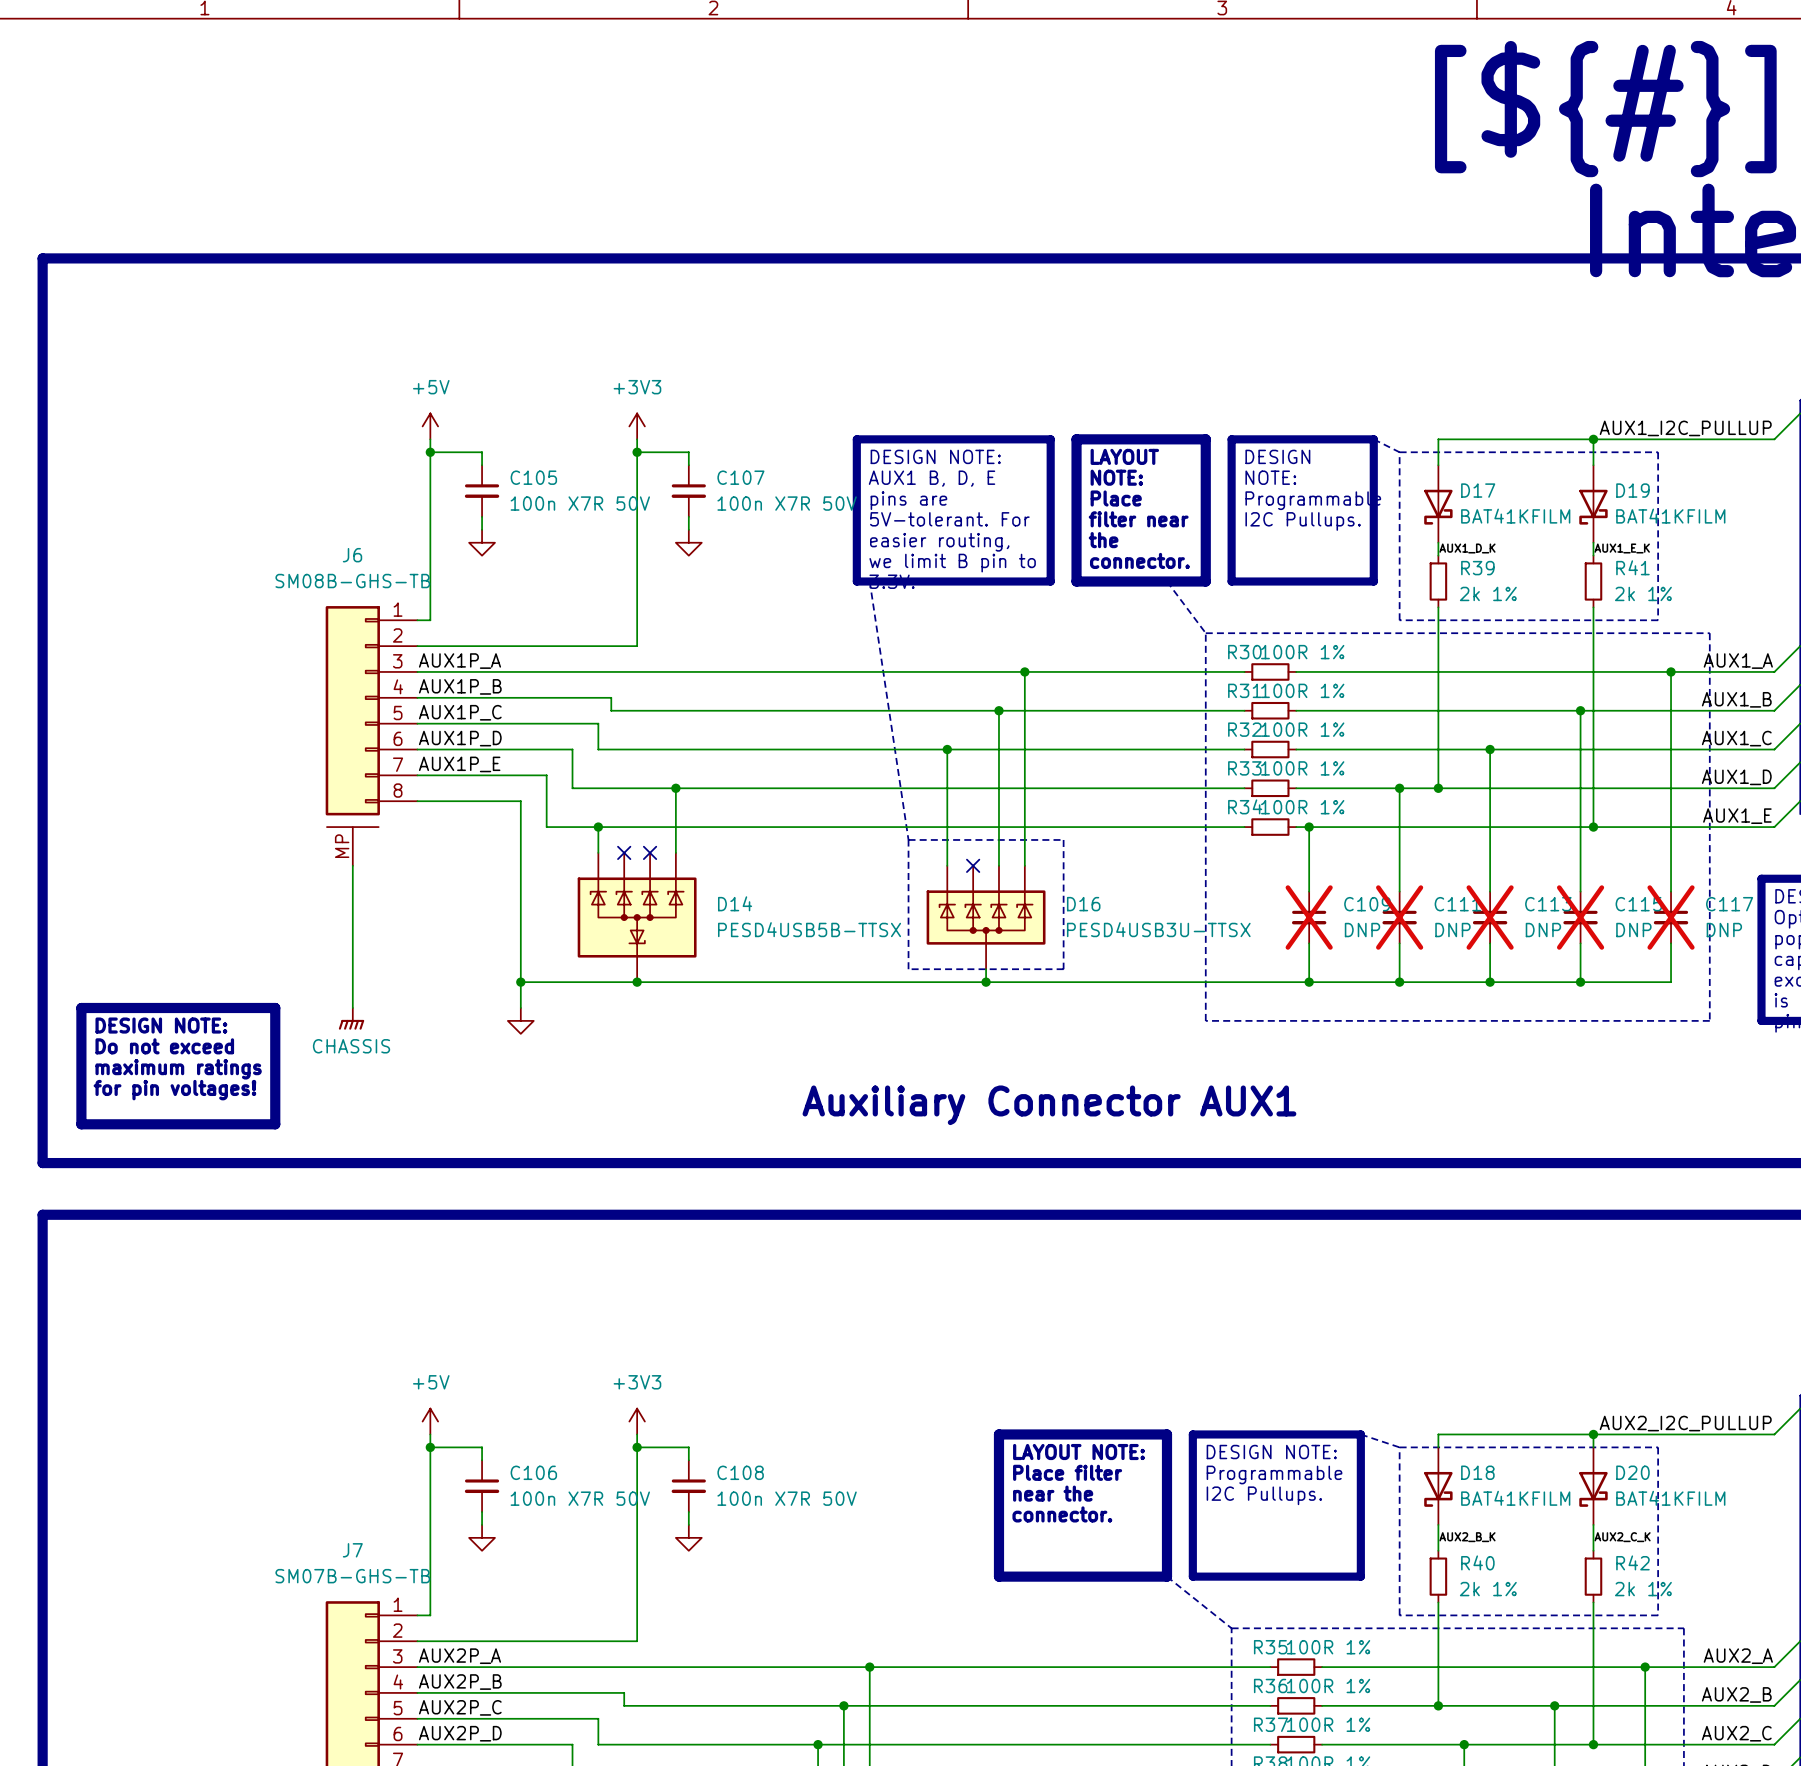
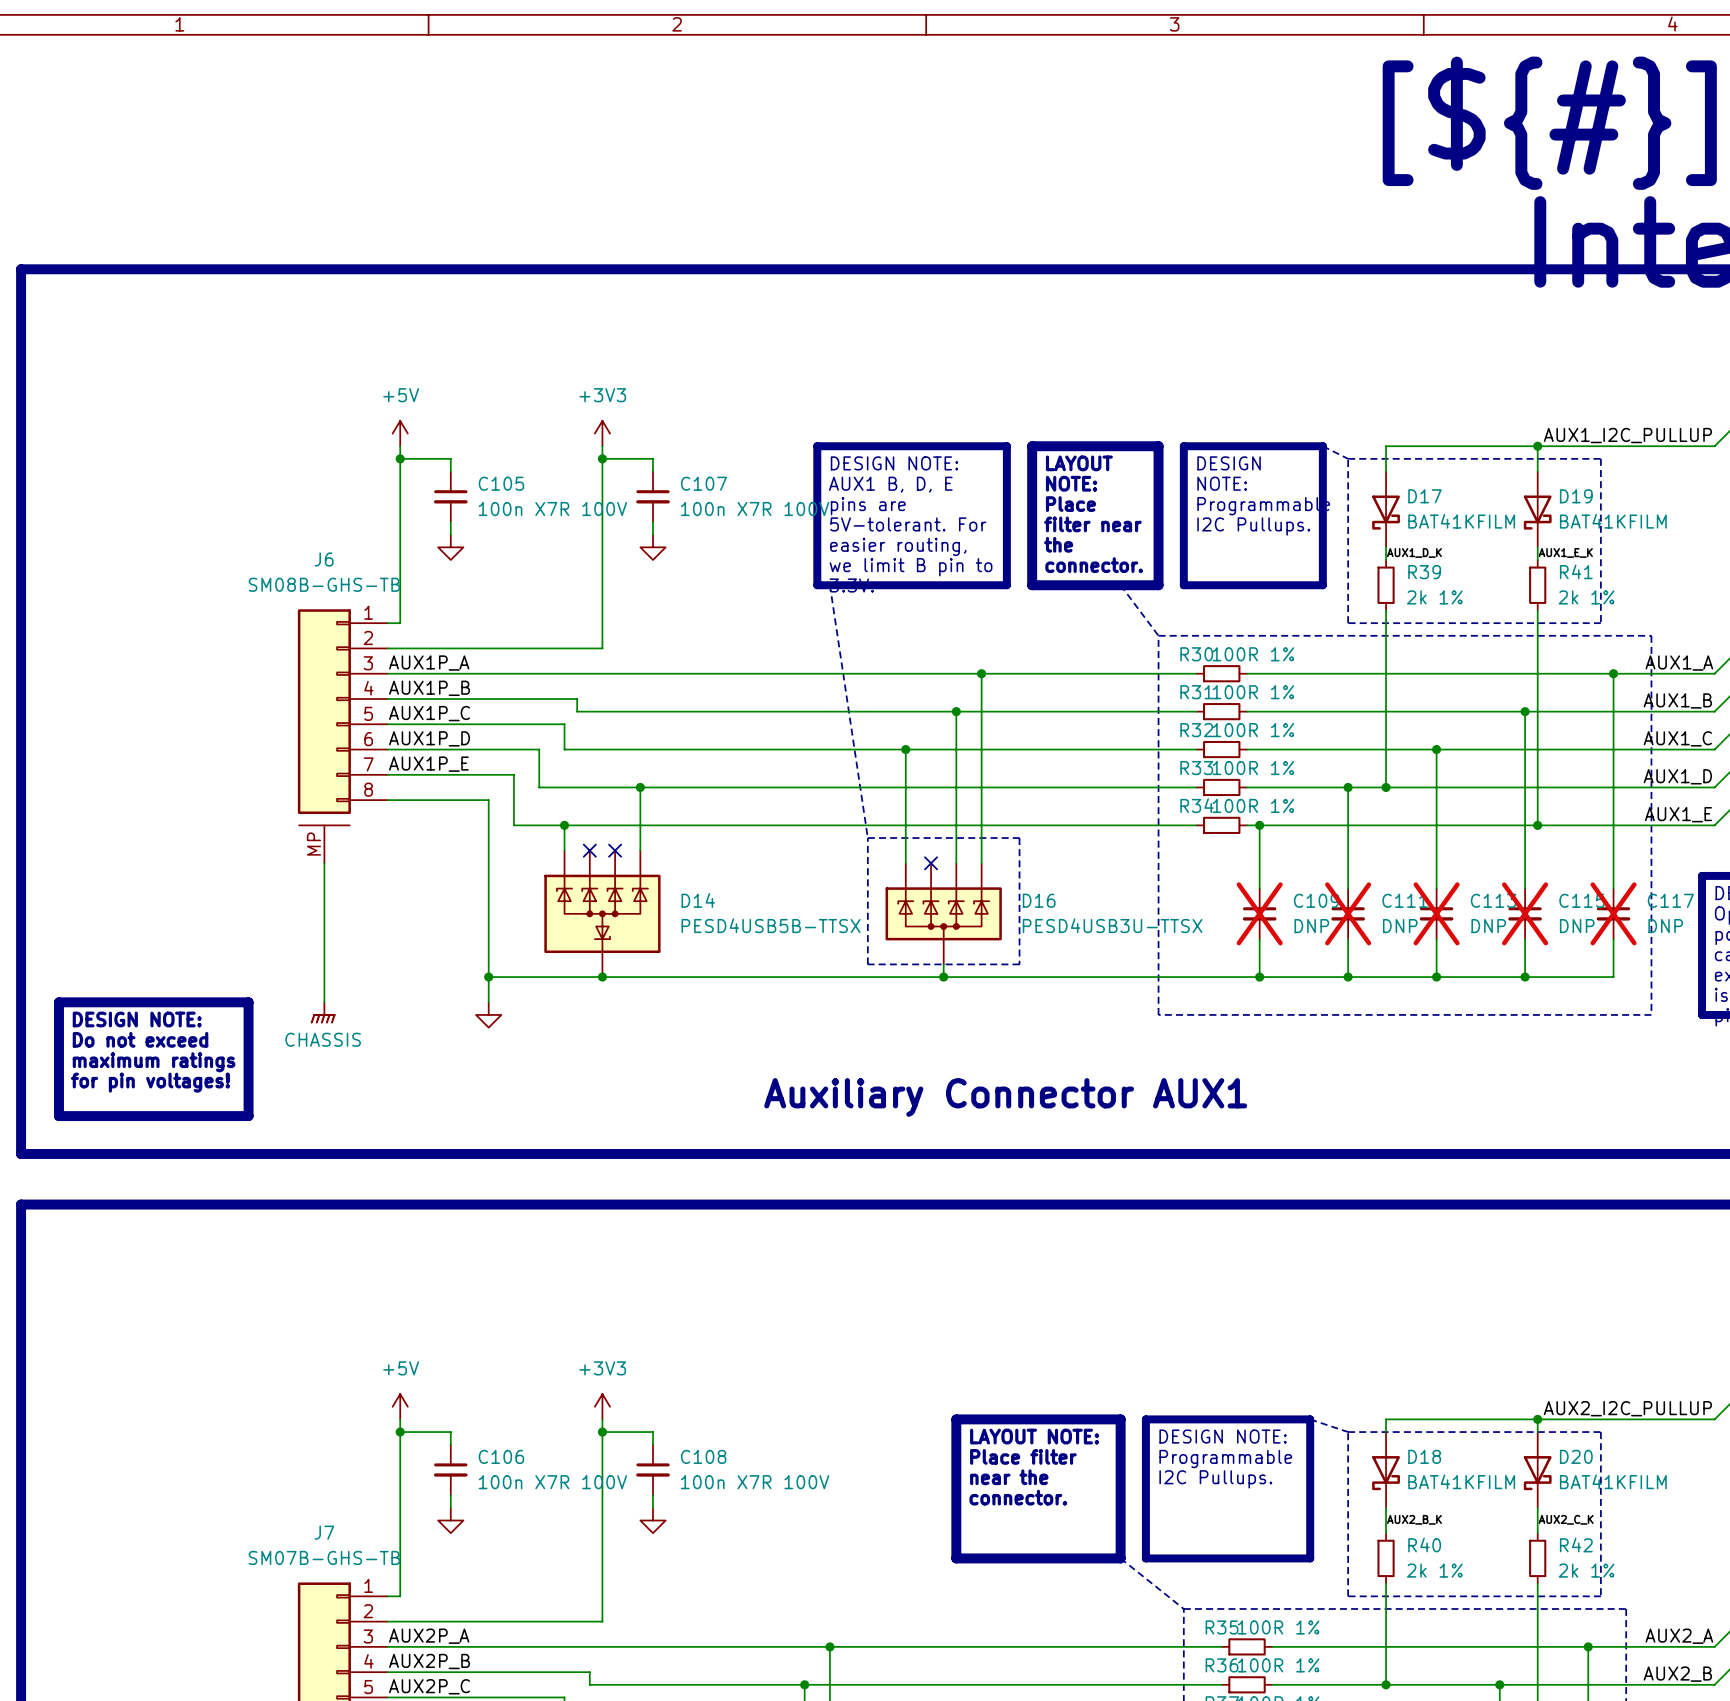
C105 value: 100n X7R 50V (580, 503) -> 100n X7R 100V (552, 509)
C107 value: 100n X7R 50V (787, 503) -> 100n X7R 100V (755, 509)
C106 value: 100n X7R 50V (580, 1498) -> 100n X7R 100V (552, 1482)
C108 value: 100n X7R 50V (787, 1498) -> 100n X7R 100V (755, 1482)

